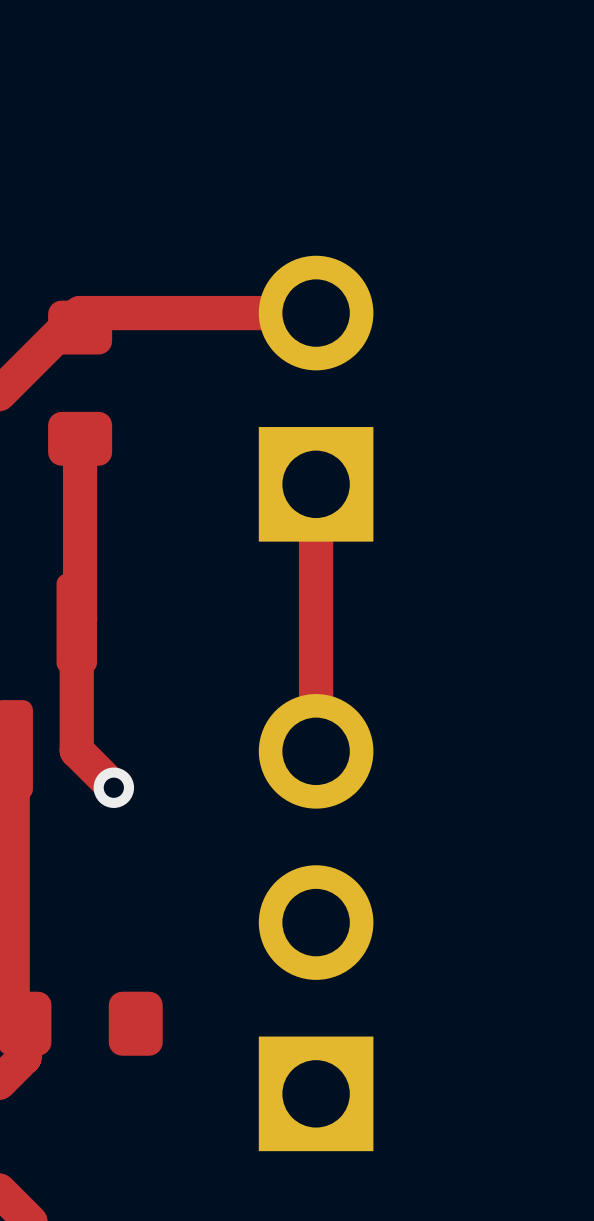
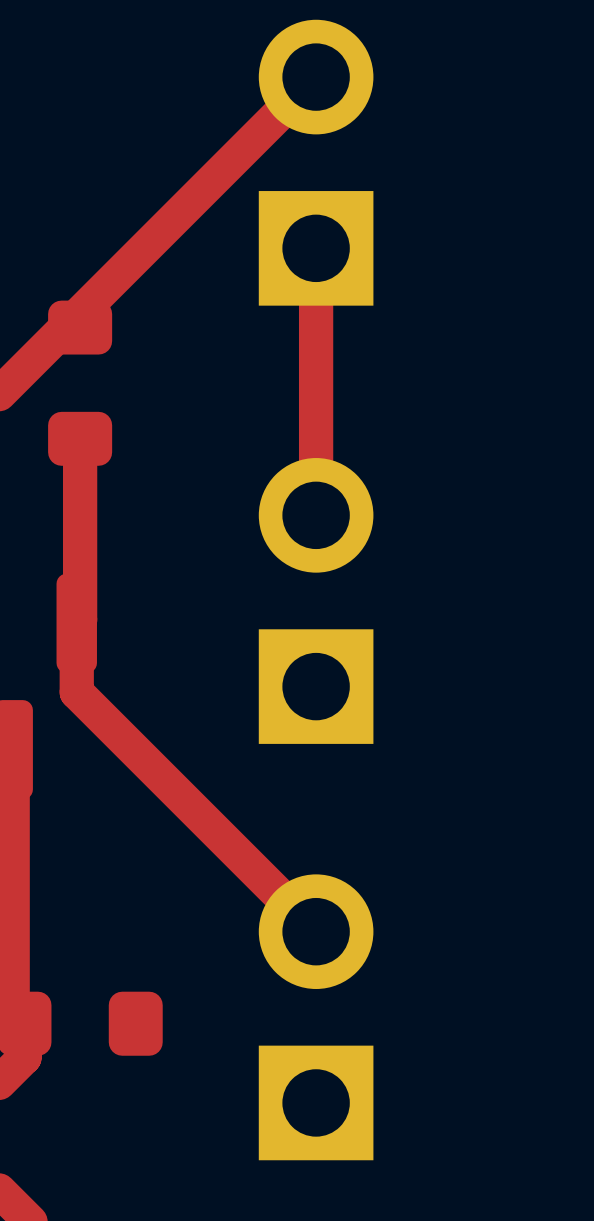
part: none -> (316, 162)
top track: (316, 313) (80, 313) -> (316, 77) (80, 313)
part: (316, 398) -> none
top track: (316, 515) (316, 751) -> (316, 248) (316, 484)
part: none -> (316, 600)
top track: (76, 692) (76, 750) (113, 787) -> (76, 692) (316, 931)
via: (113, 787) -> none
part: (316, 922) -> none
part: none -> (316, 1017)

